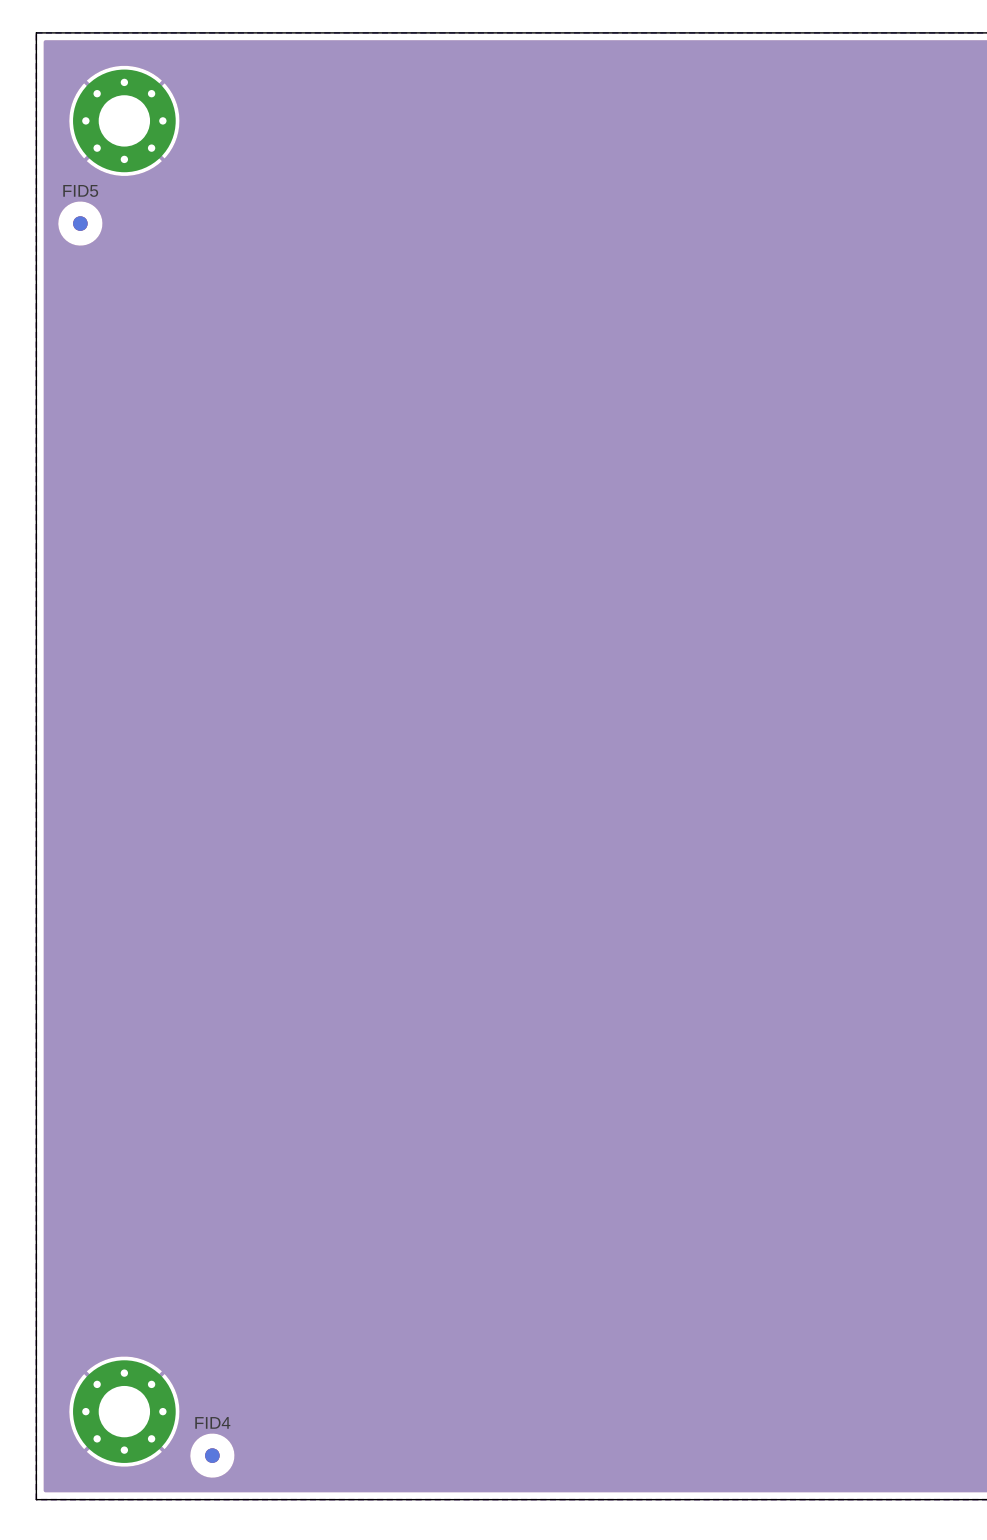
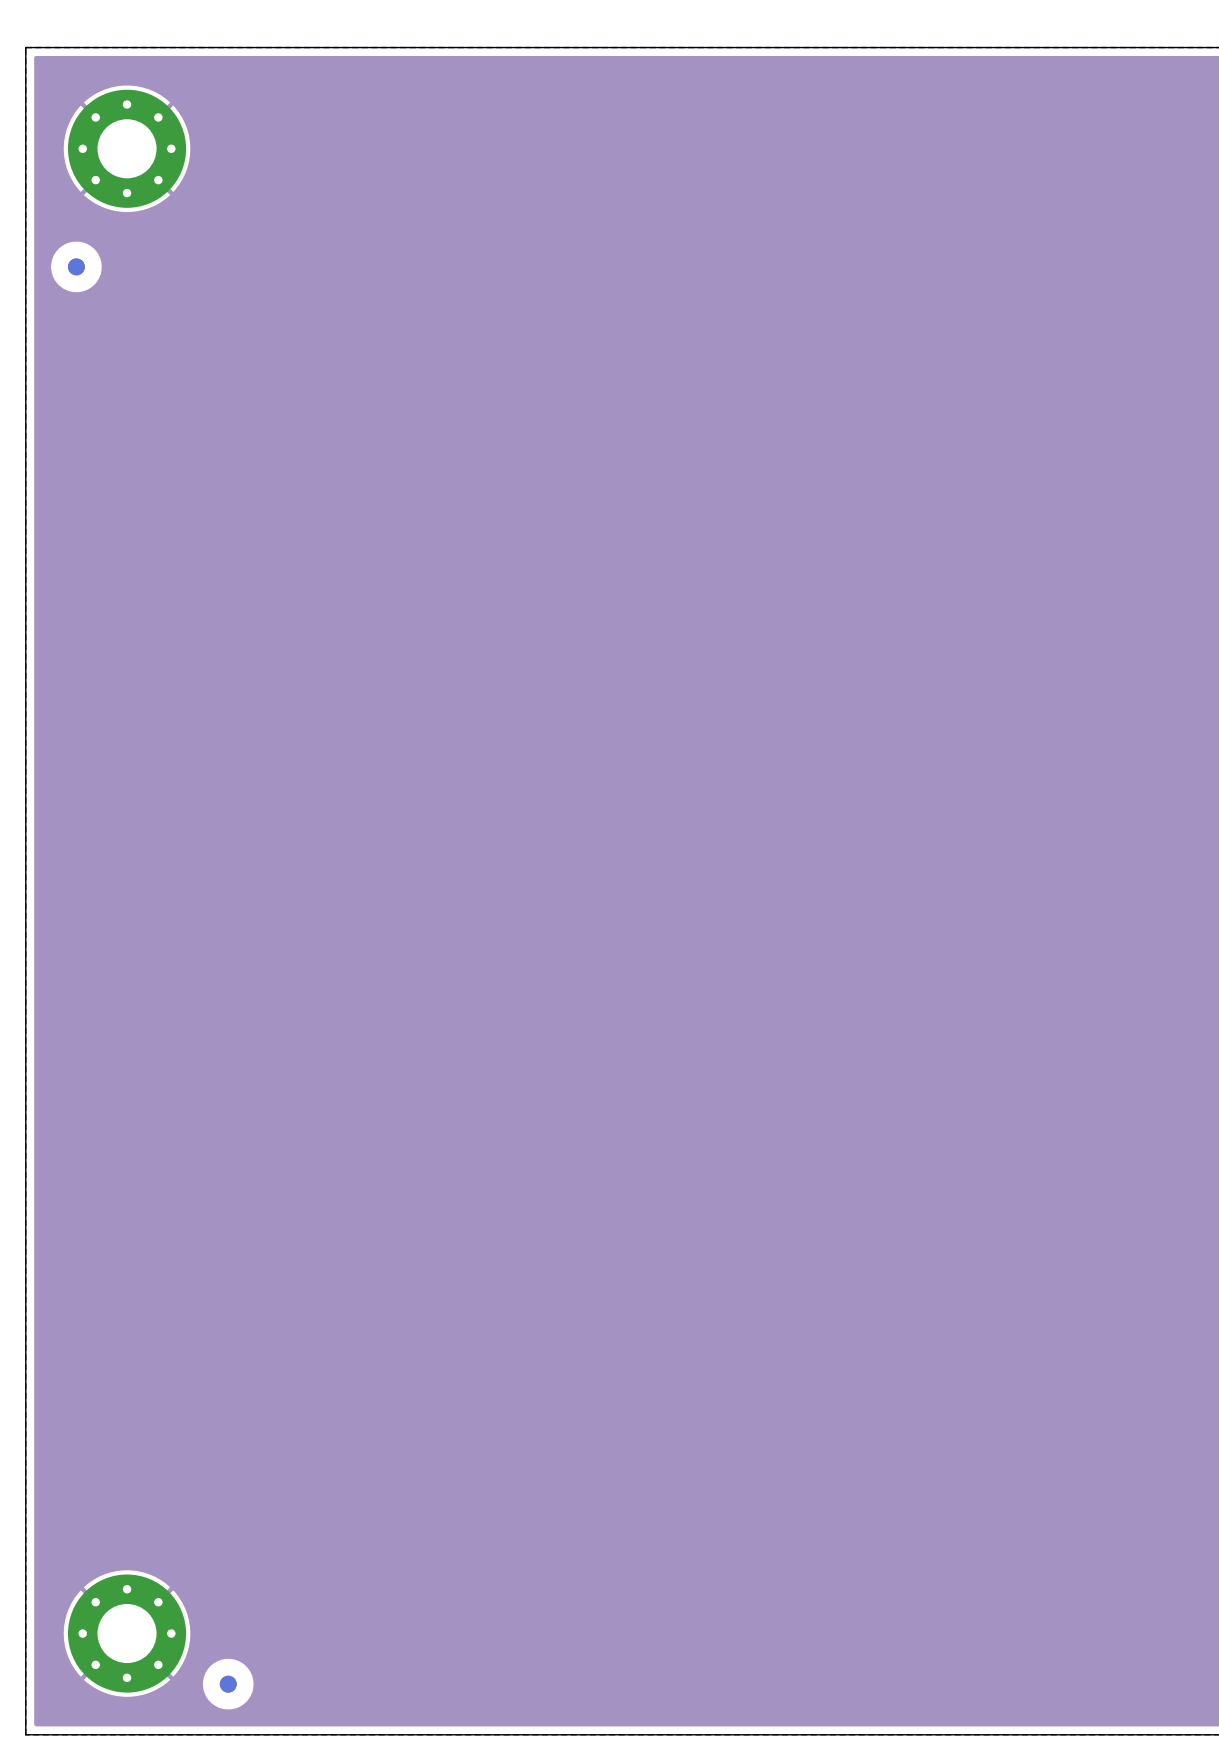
FID5 name: FID5 (80, 190) -> none
FID4 name: FID4 (212, 1422) -> none

